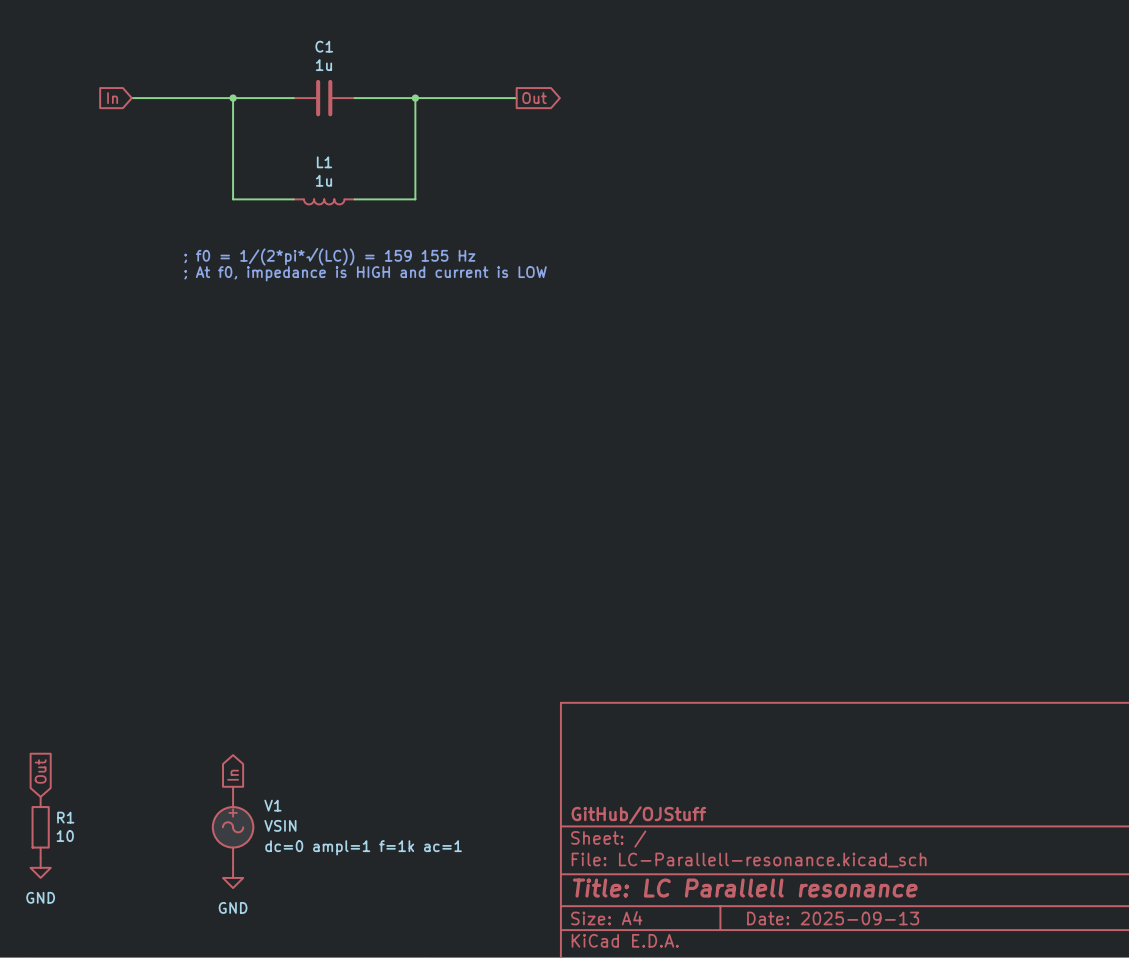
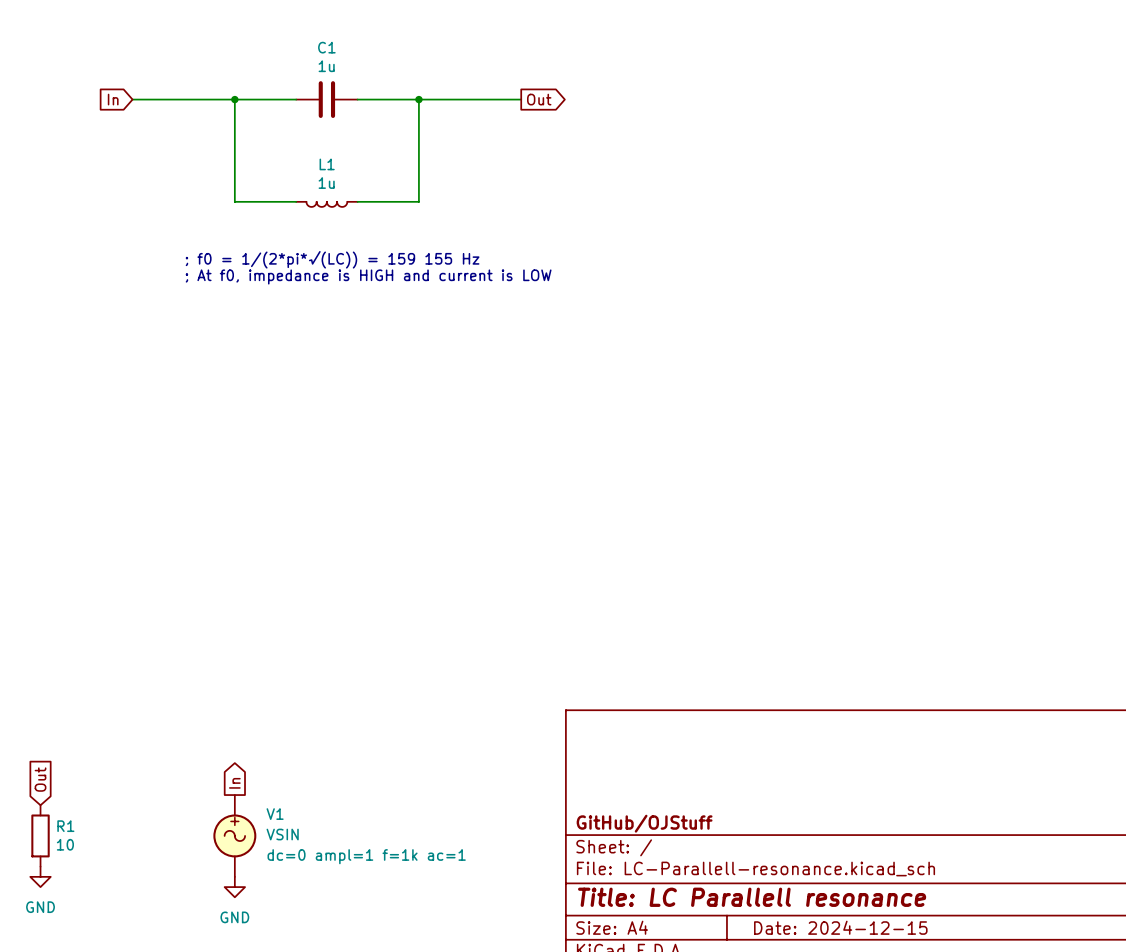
title block: Date: 2025-09-13 (833, 918) -> Date: 2024-12-15 (840, 927)

